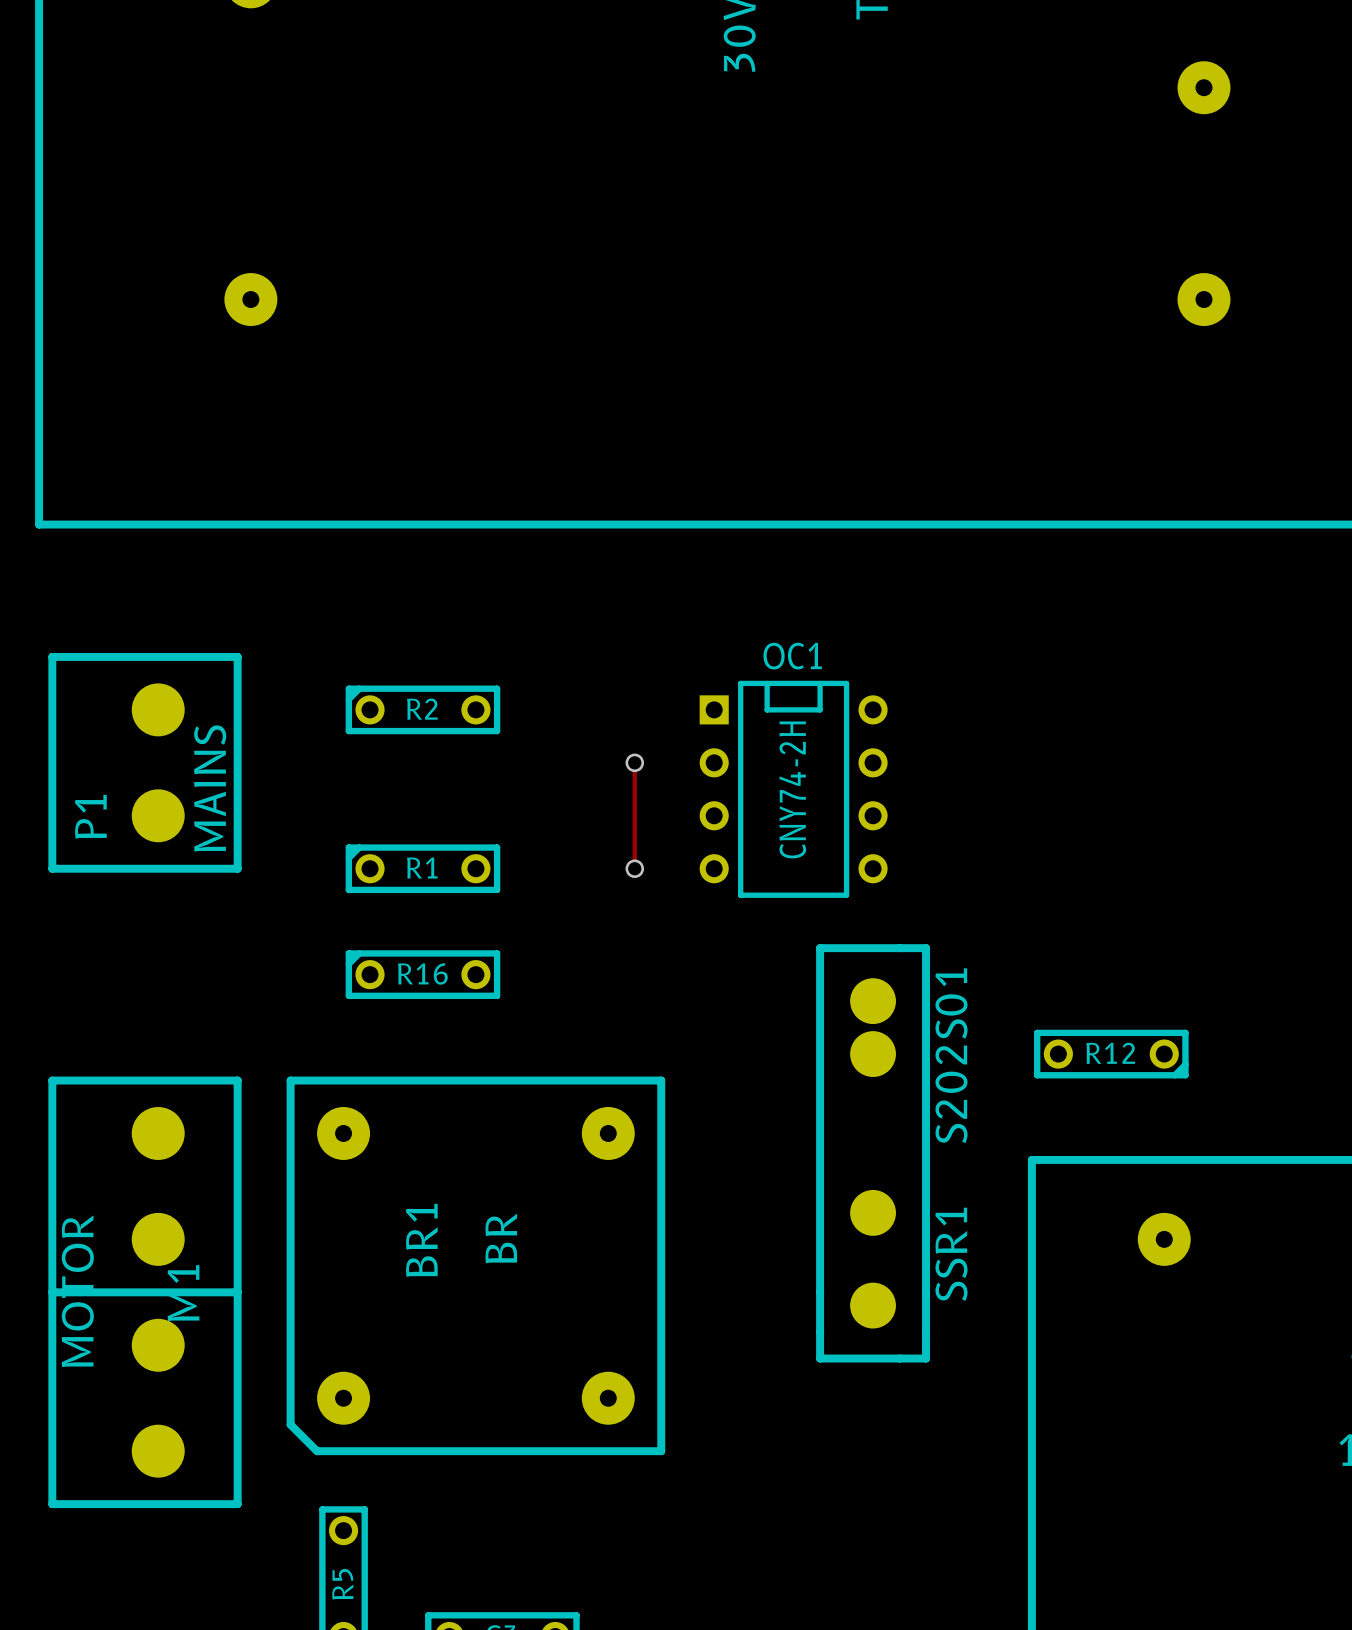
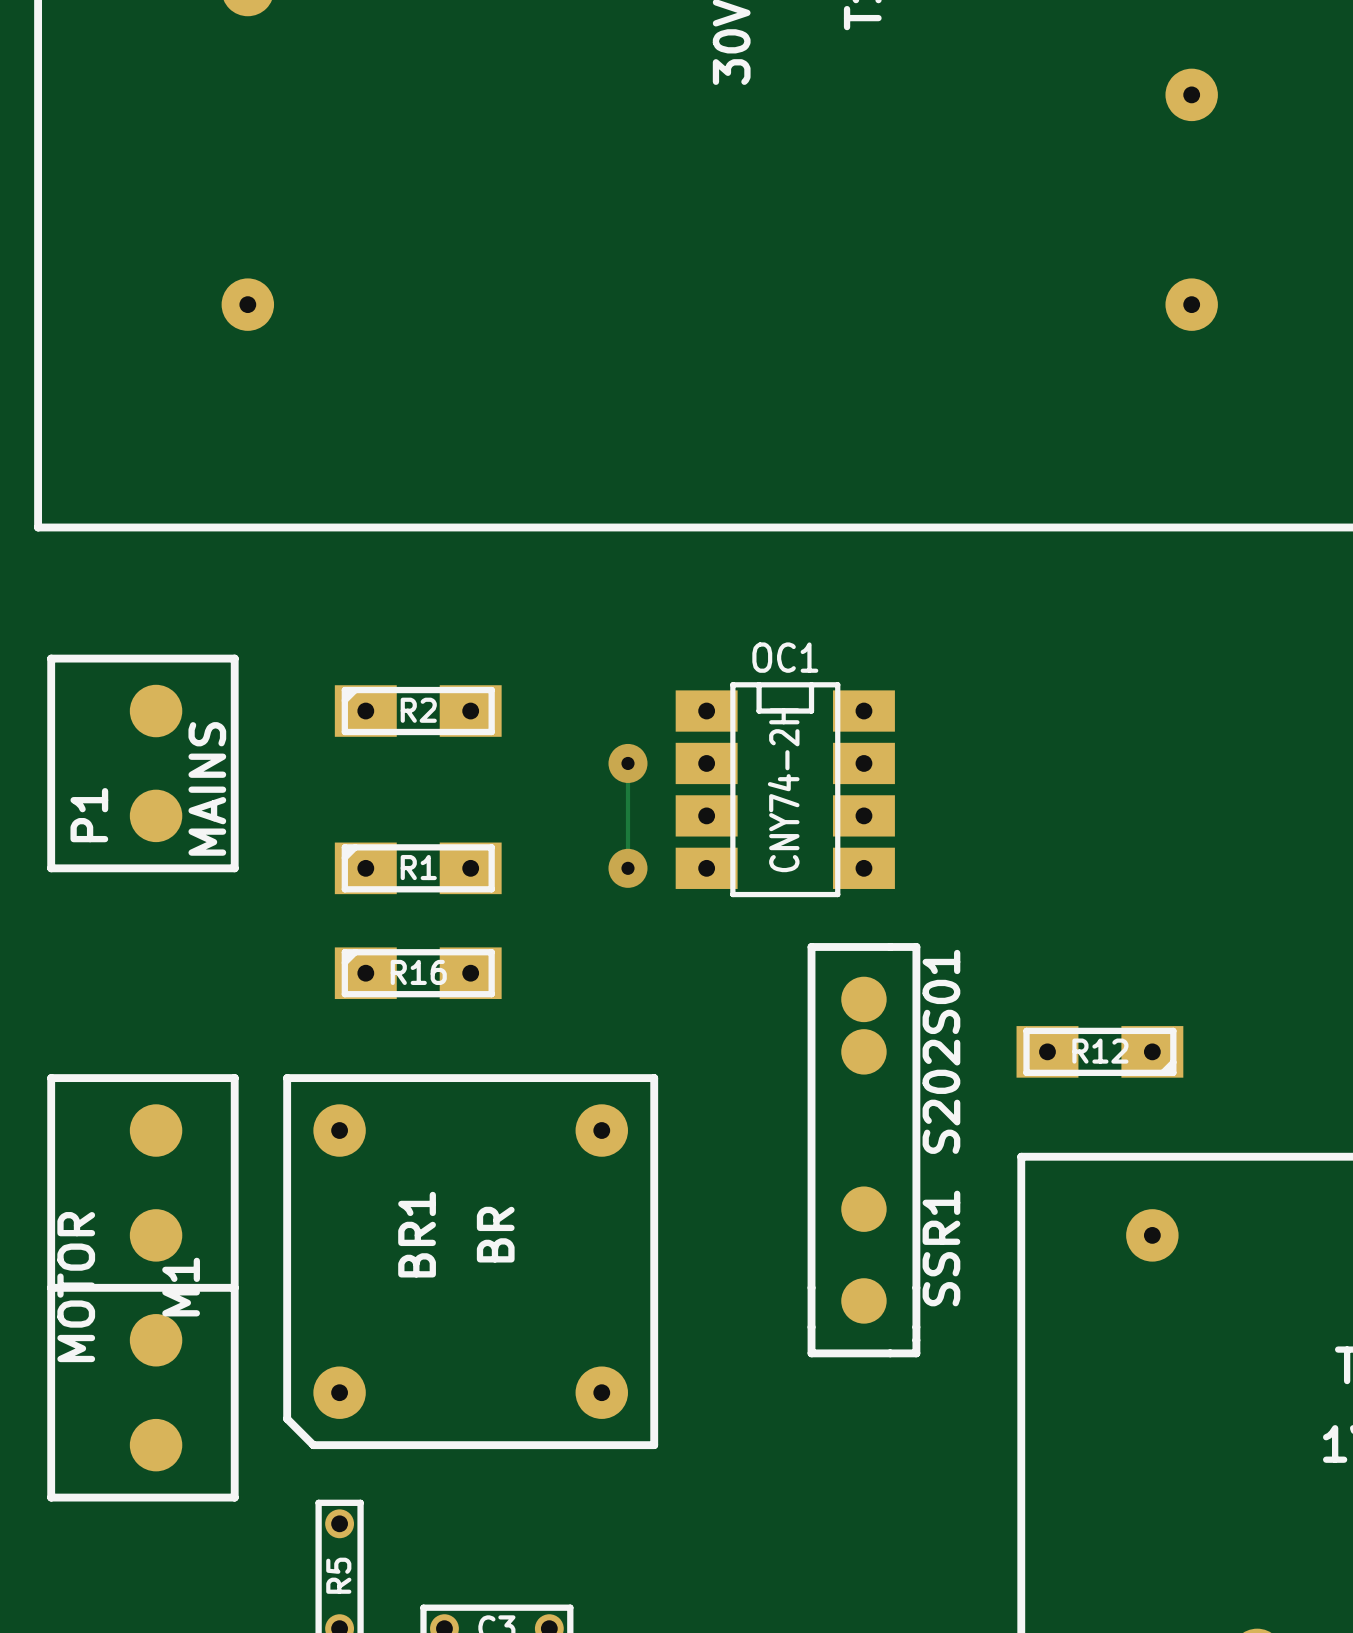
OC1 footprint: [699, 680, 888, 898] -> [675, 682, 895, 898]
R2 footprint: [345, 685, 501, 735] -> [334, 685, 502, 737]
via size: [625, 753, 645, 773] -> [608, 743, 648, 783]
R1 footprint: [345, 844, 501, 894] -> [334, 842, 502, 895]
via size: [625, 859, 645, 879] -> [608, 848, 648, 888]
R16 footprint: [345, 950, 501, 999] -> [334, 947, 502, 1000]
R12 footprint: [1034, 1029, 1189, 1079] -> [1016, 1026, 1184, 1078]

